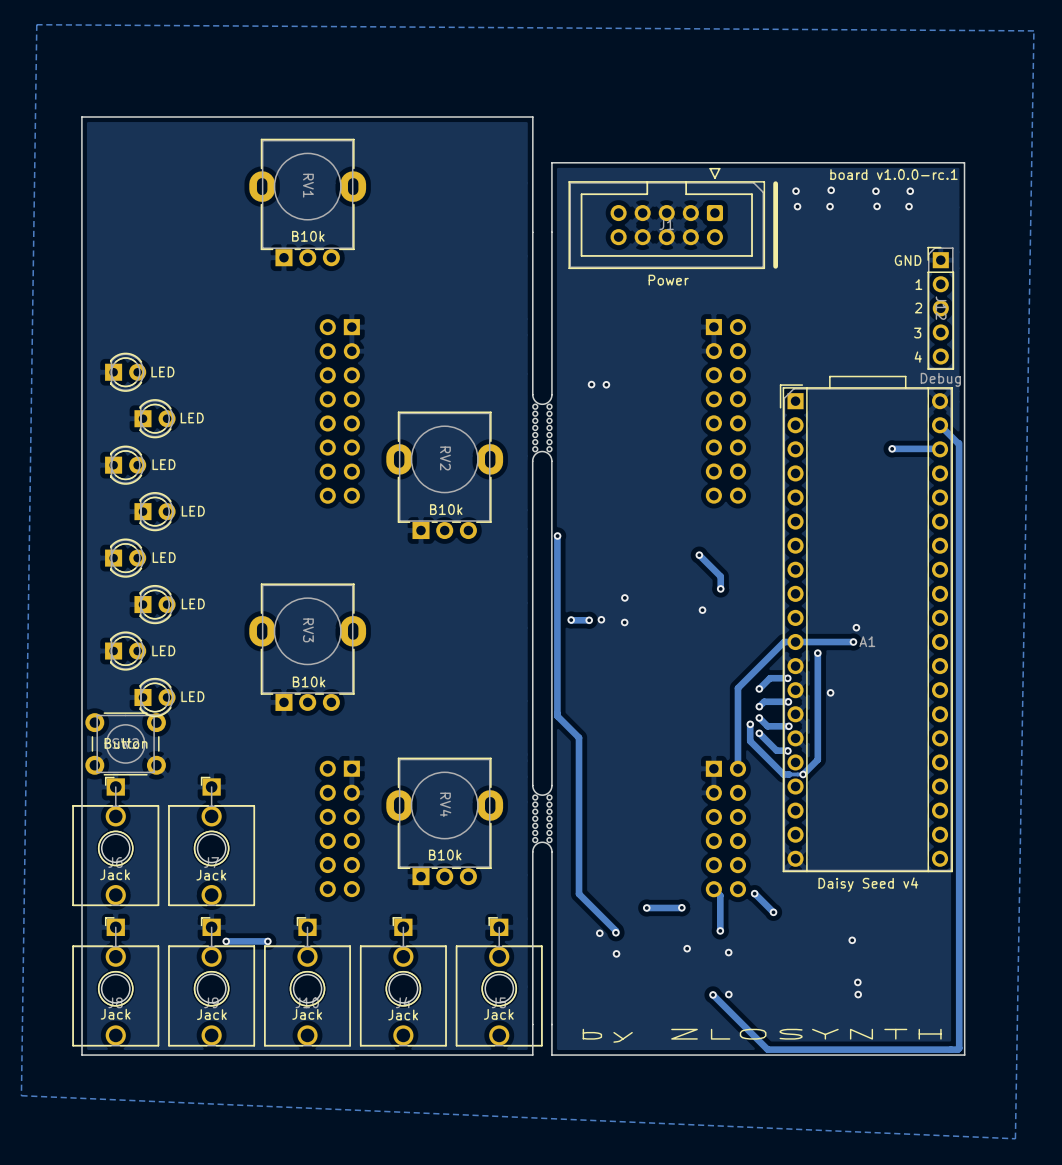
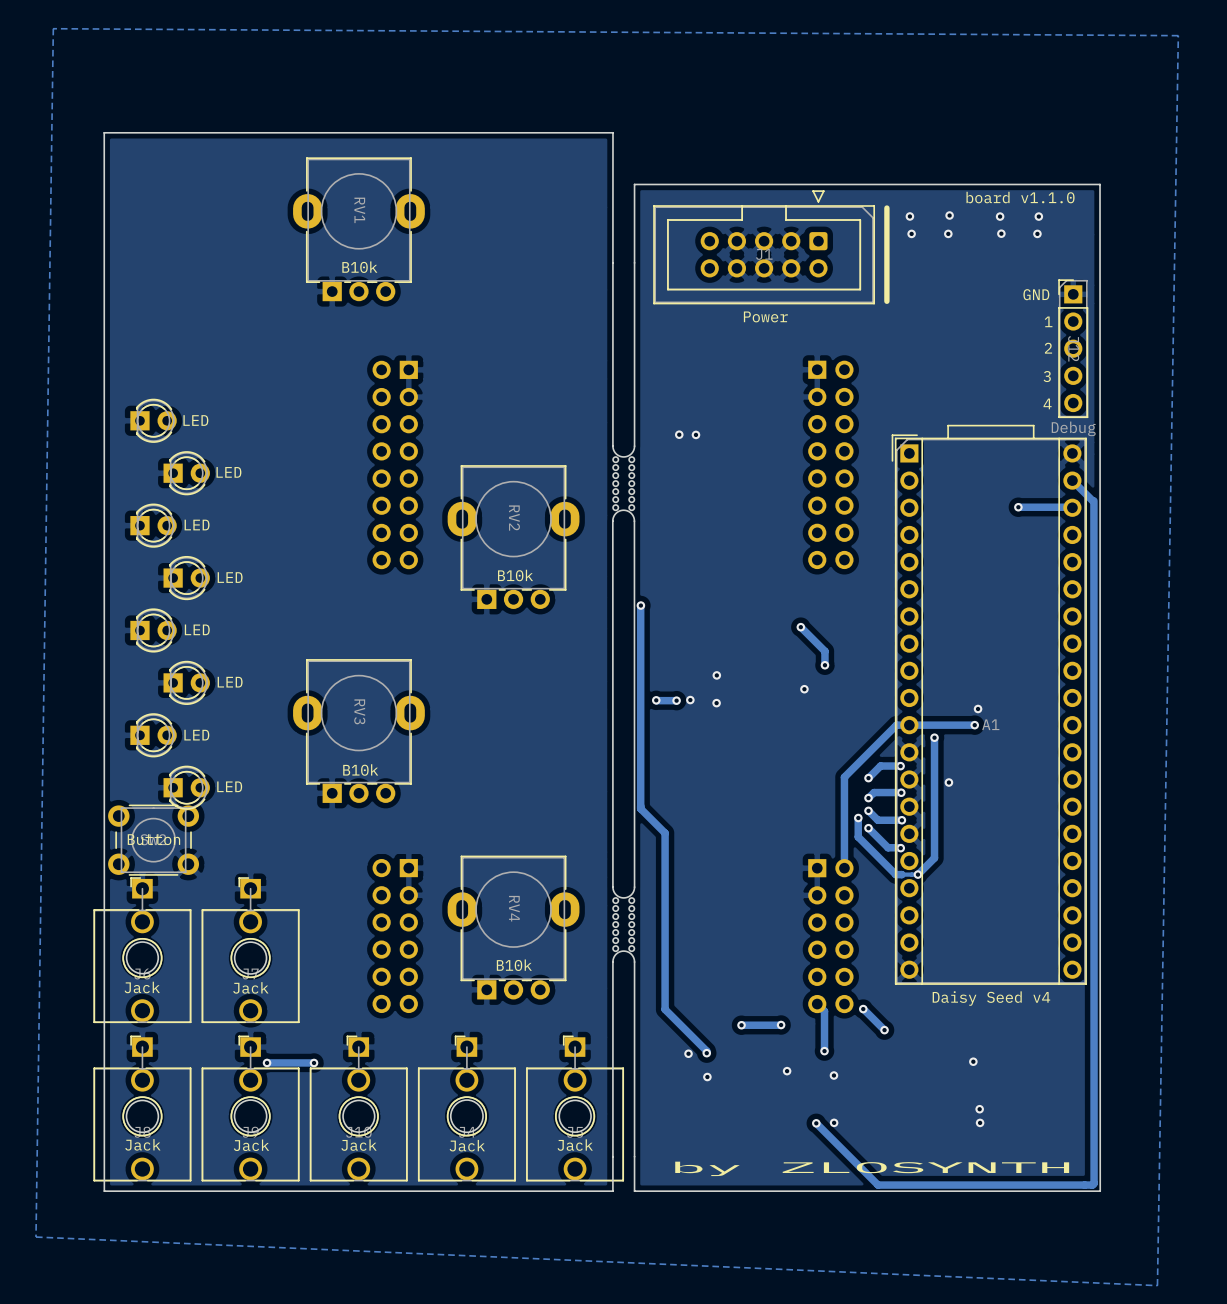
text: board v1.0.0-rc.1 (893, 174) -> board v1.1.0 (1020, 197)

